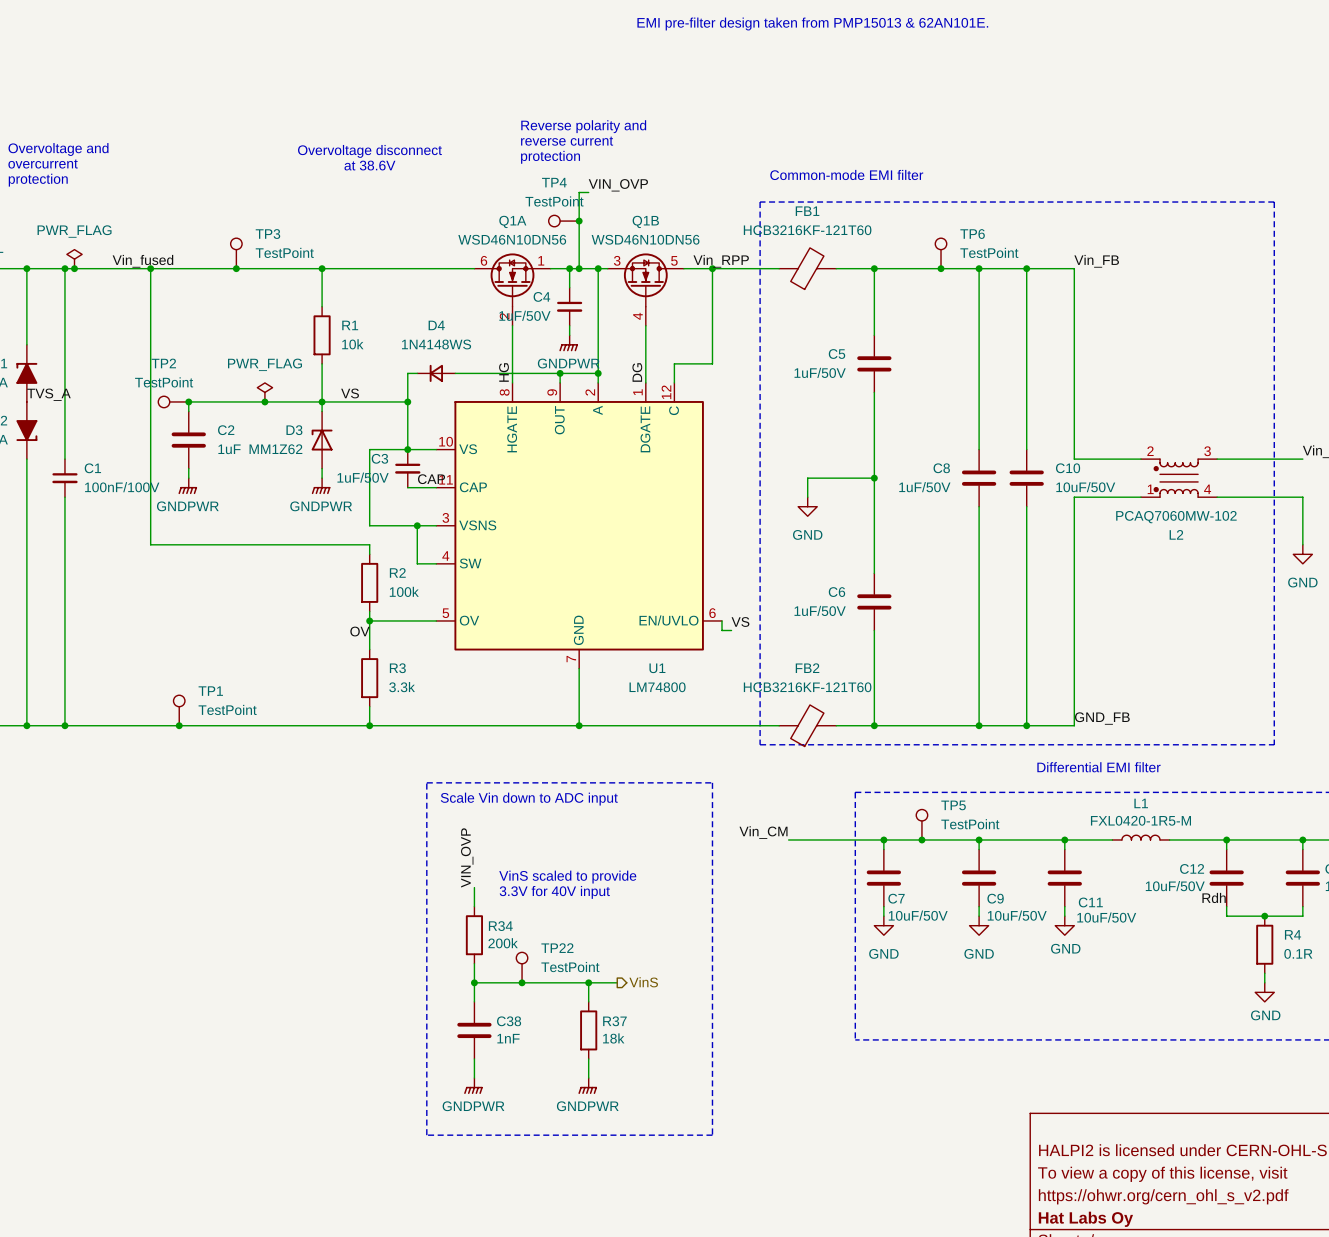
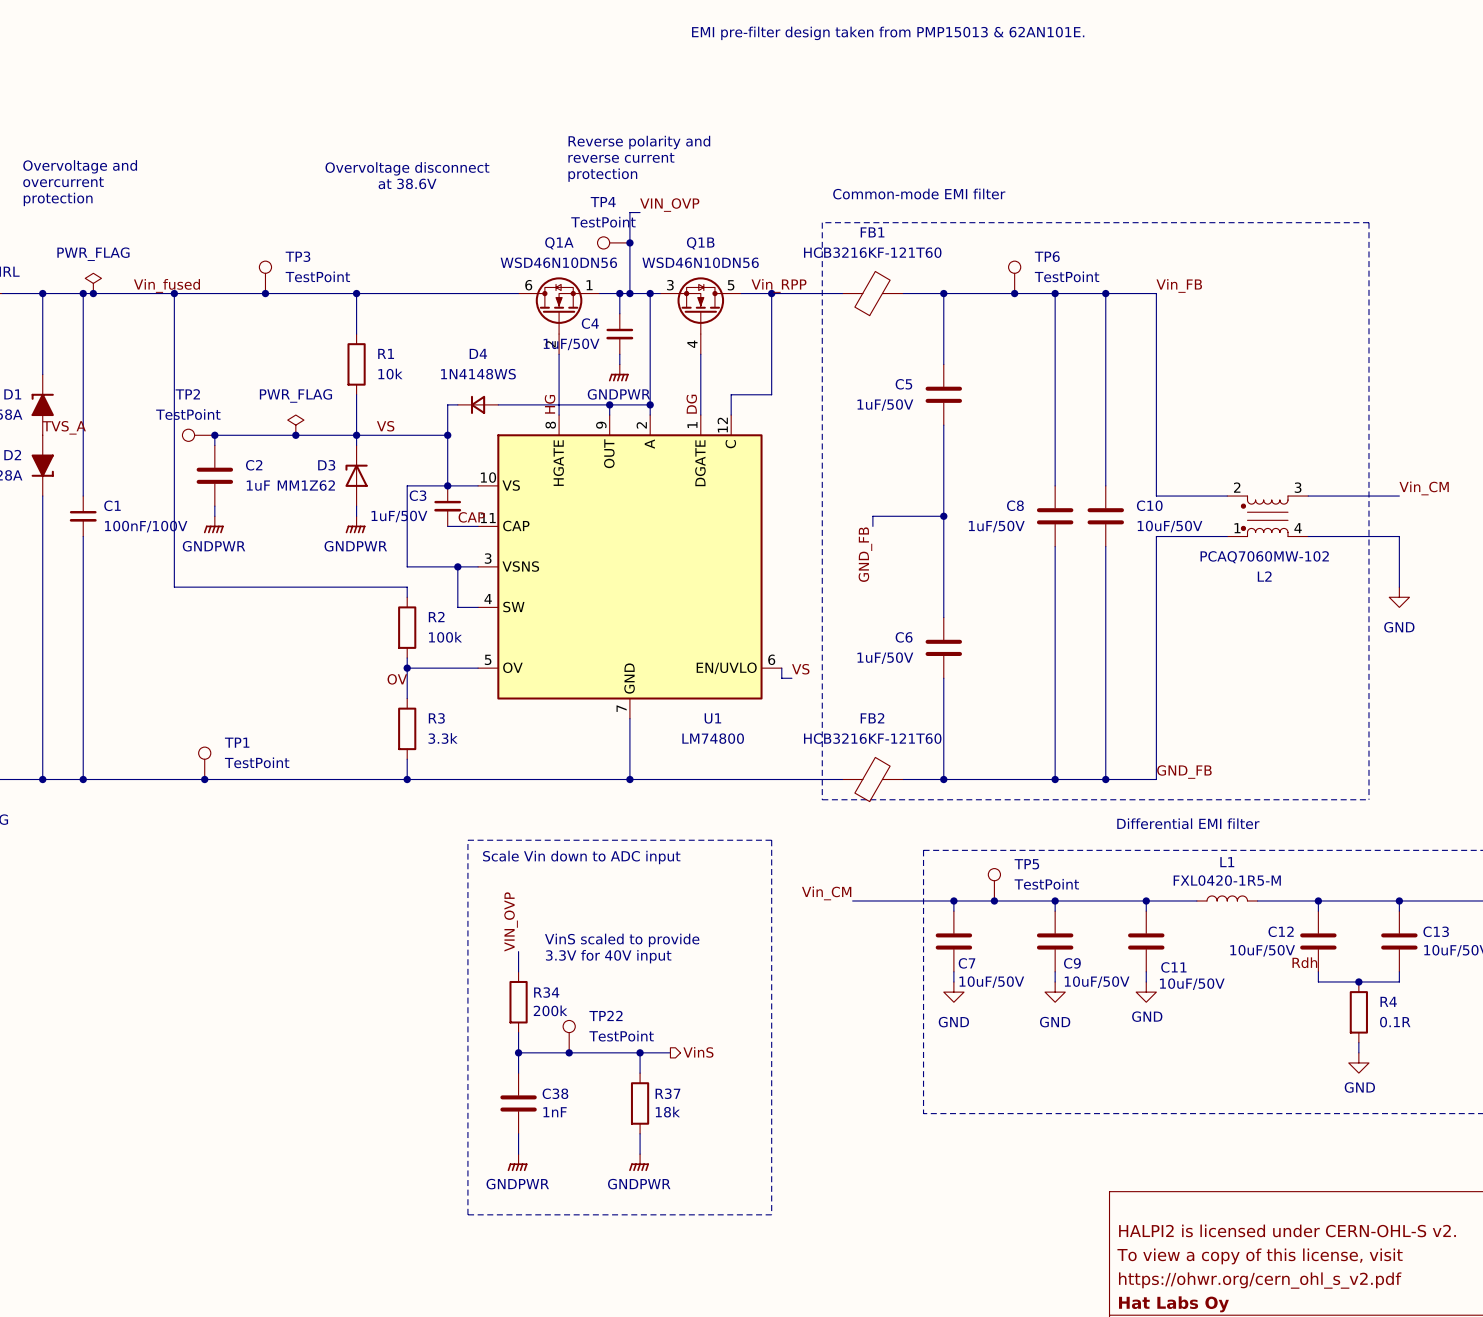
wire: (807, 487) (807, 497) -> none
power symbol: GND (807, 506) -> none
label: none -> GND_FB (865, 554)

